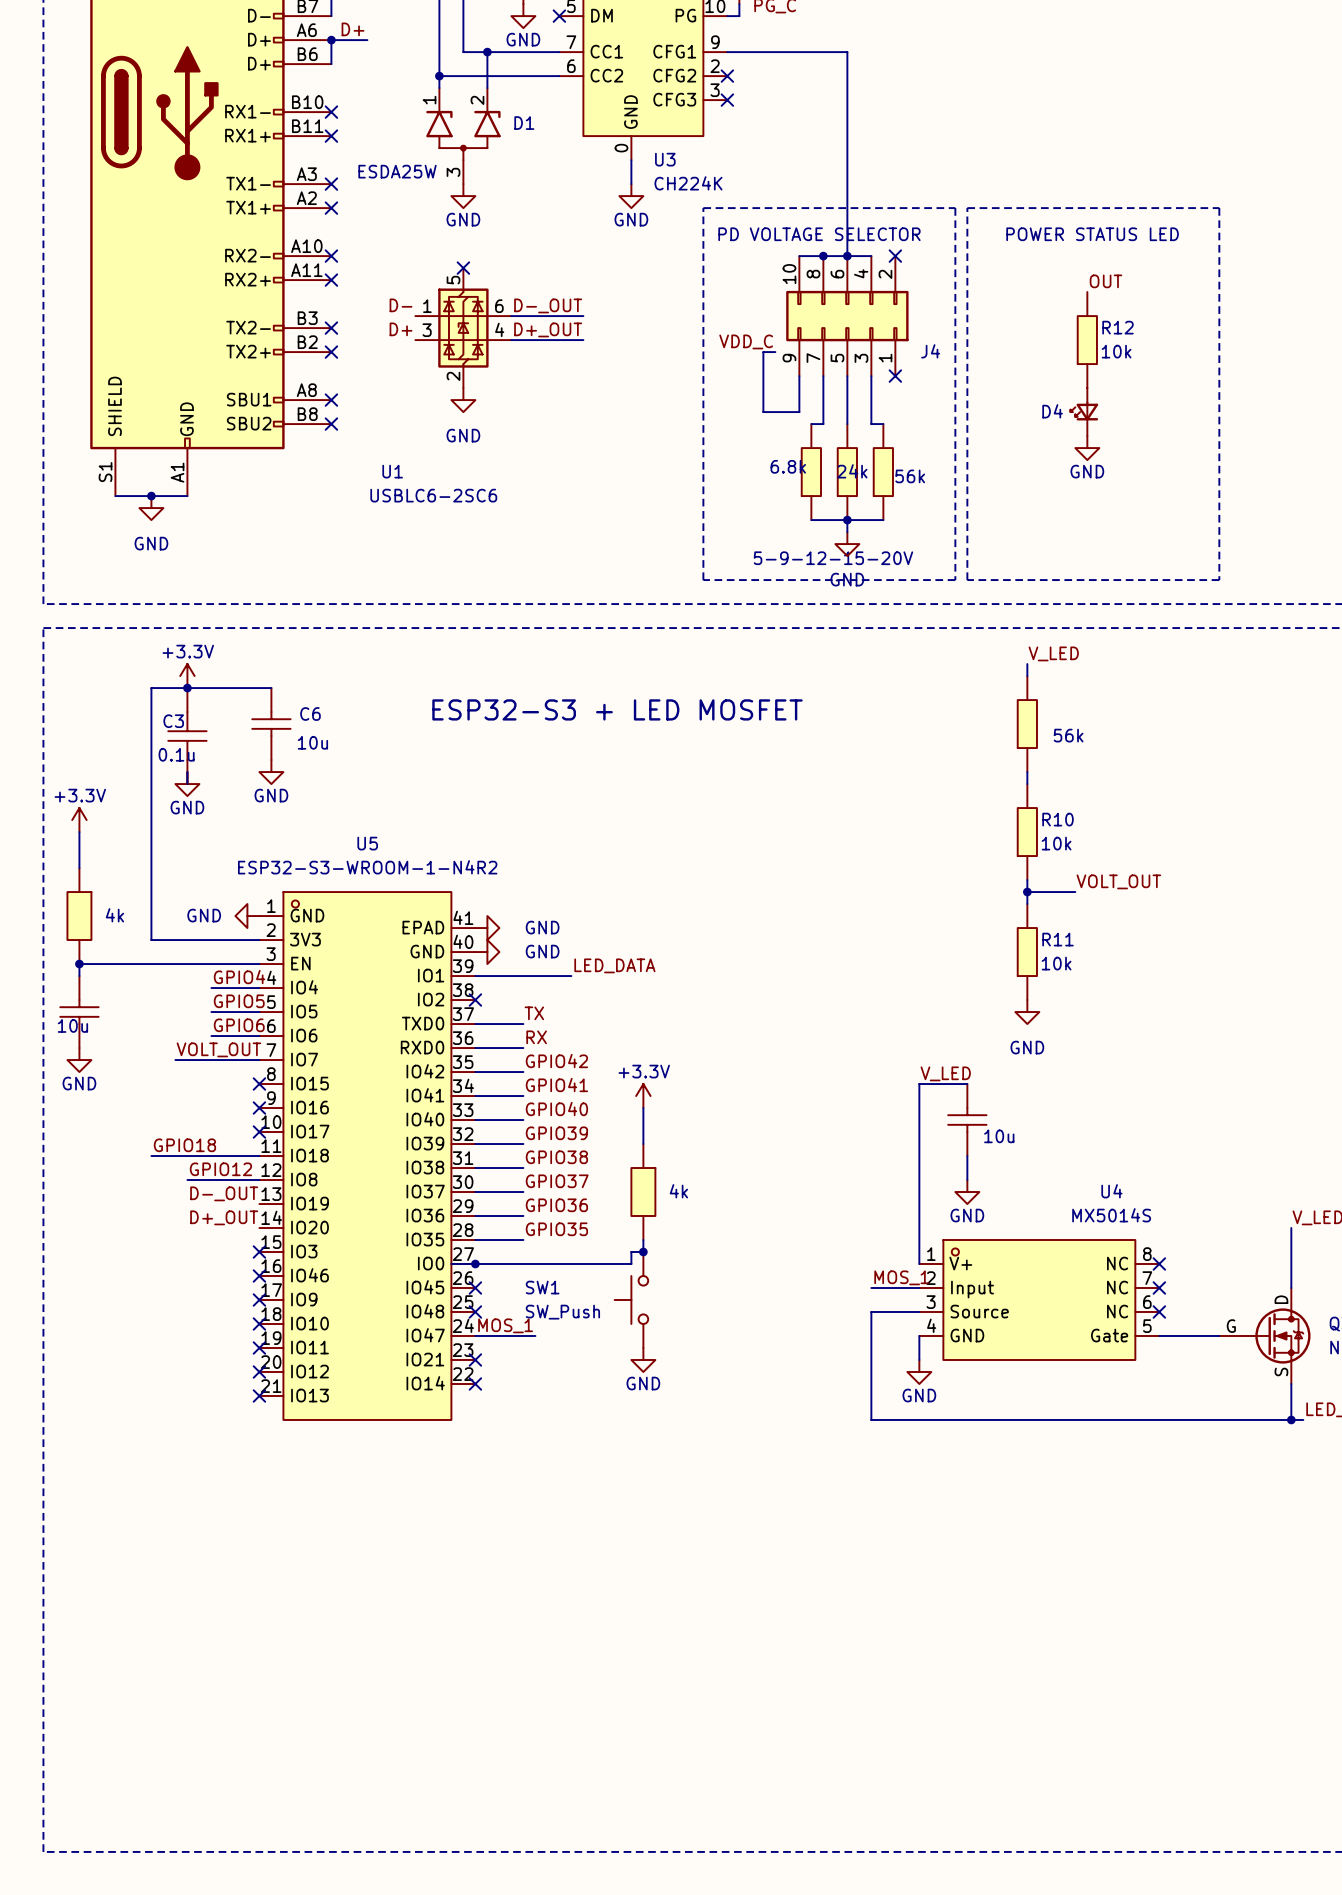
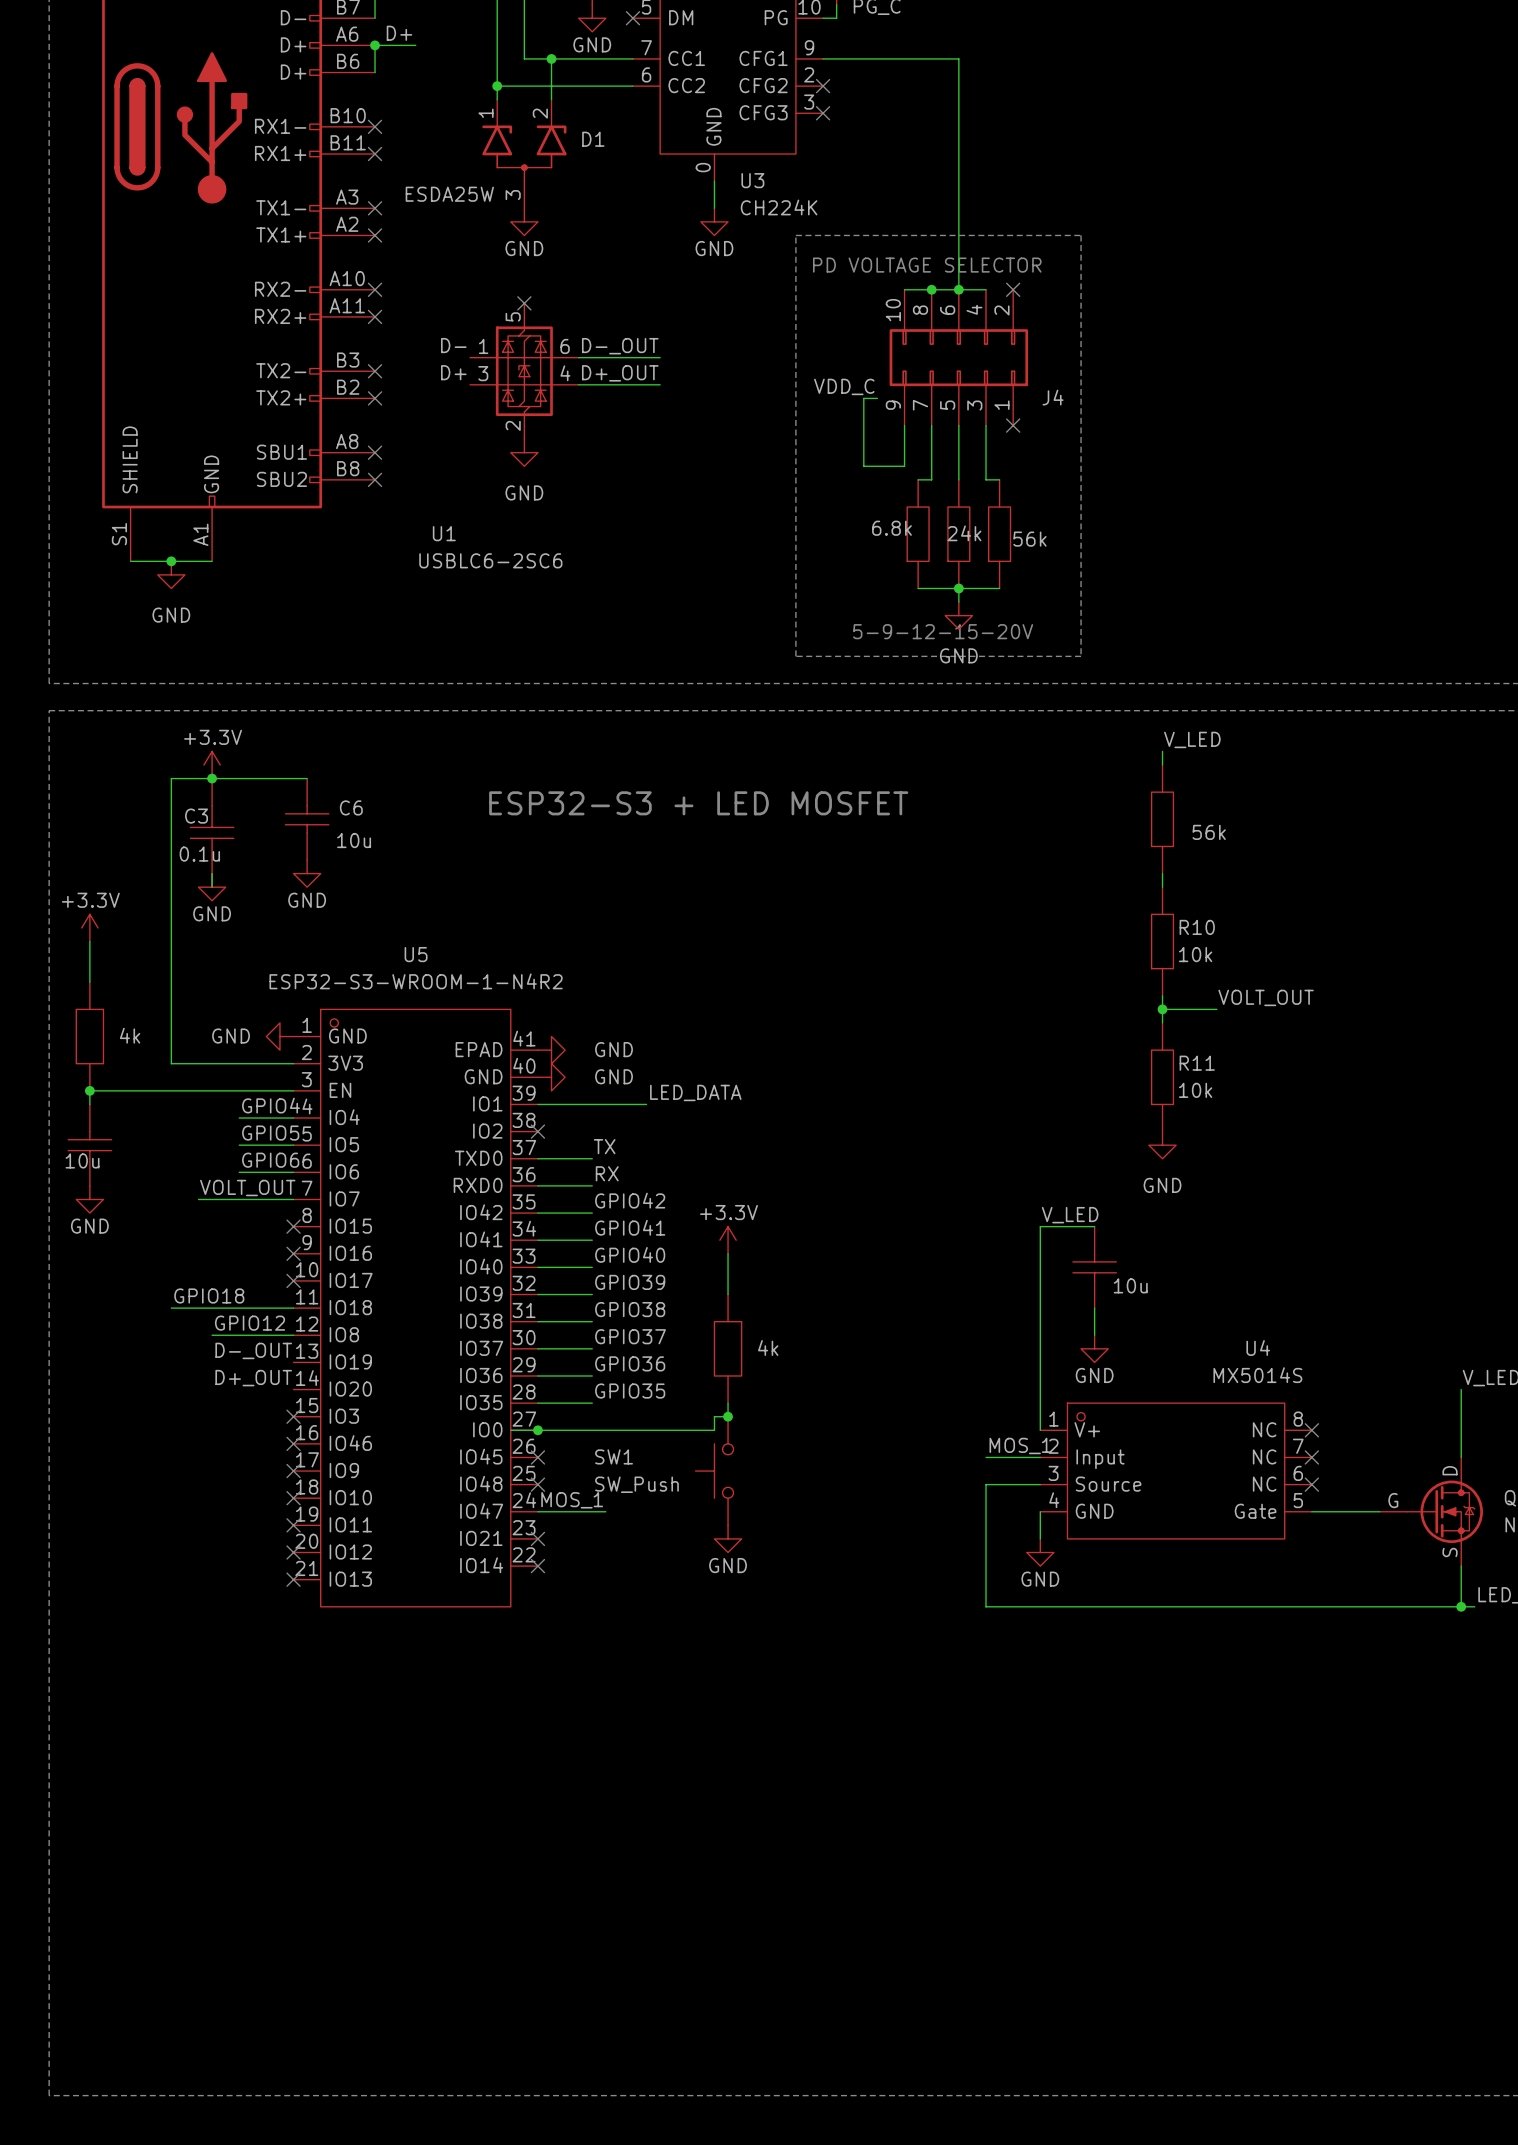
line: (967, 208) (1219, 208) (1219, 580) (967, 580) (967, 208) -> none
text: POWER STATUS LED (1092, 234) -> none
label: OUT (1106, 281) -> none
R12: 10k (1087, 340) -> none
D4: (1084, 412) -> none
power symbol: GND (1087, 448) -> none

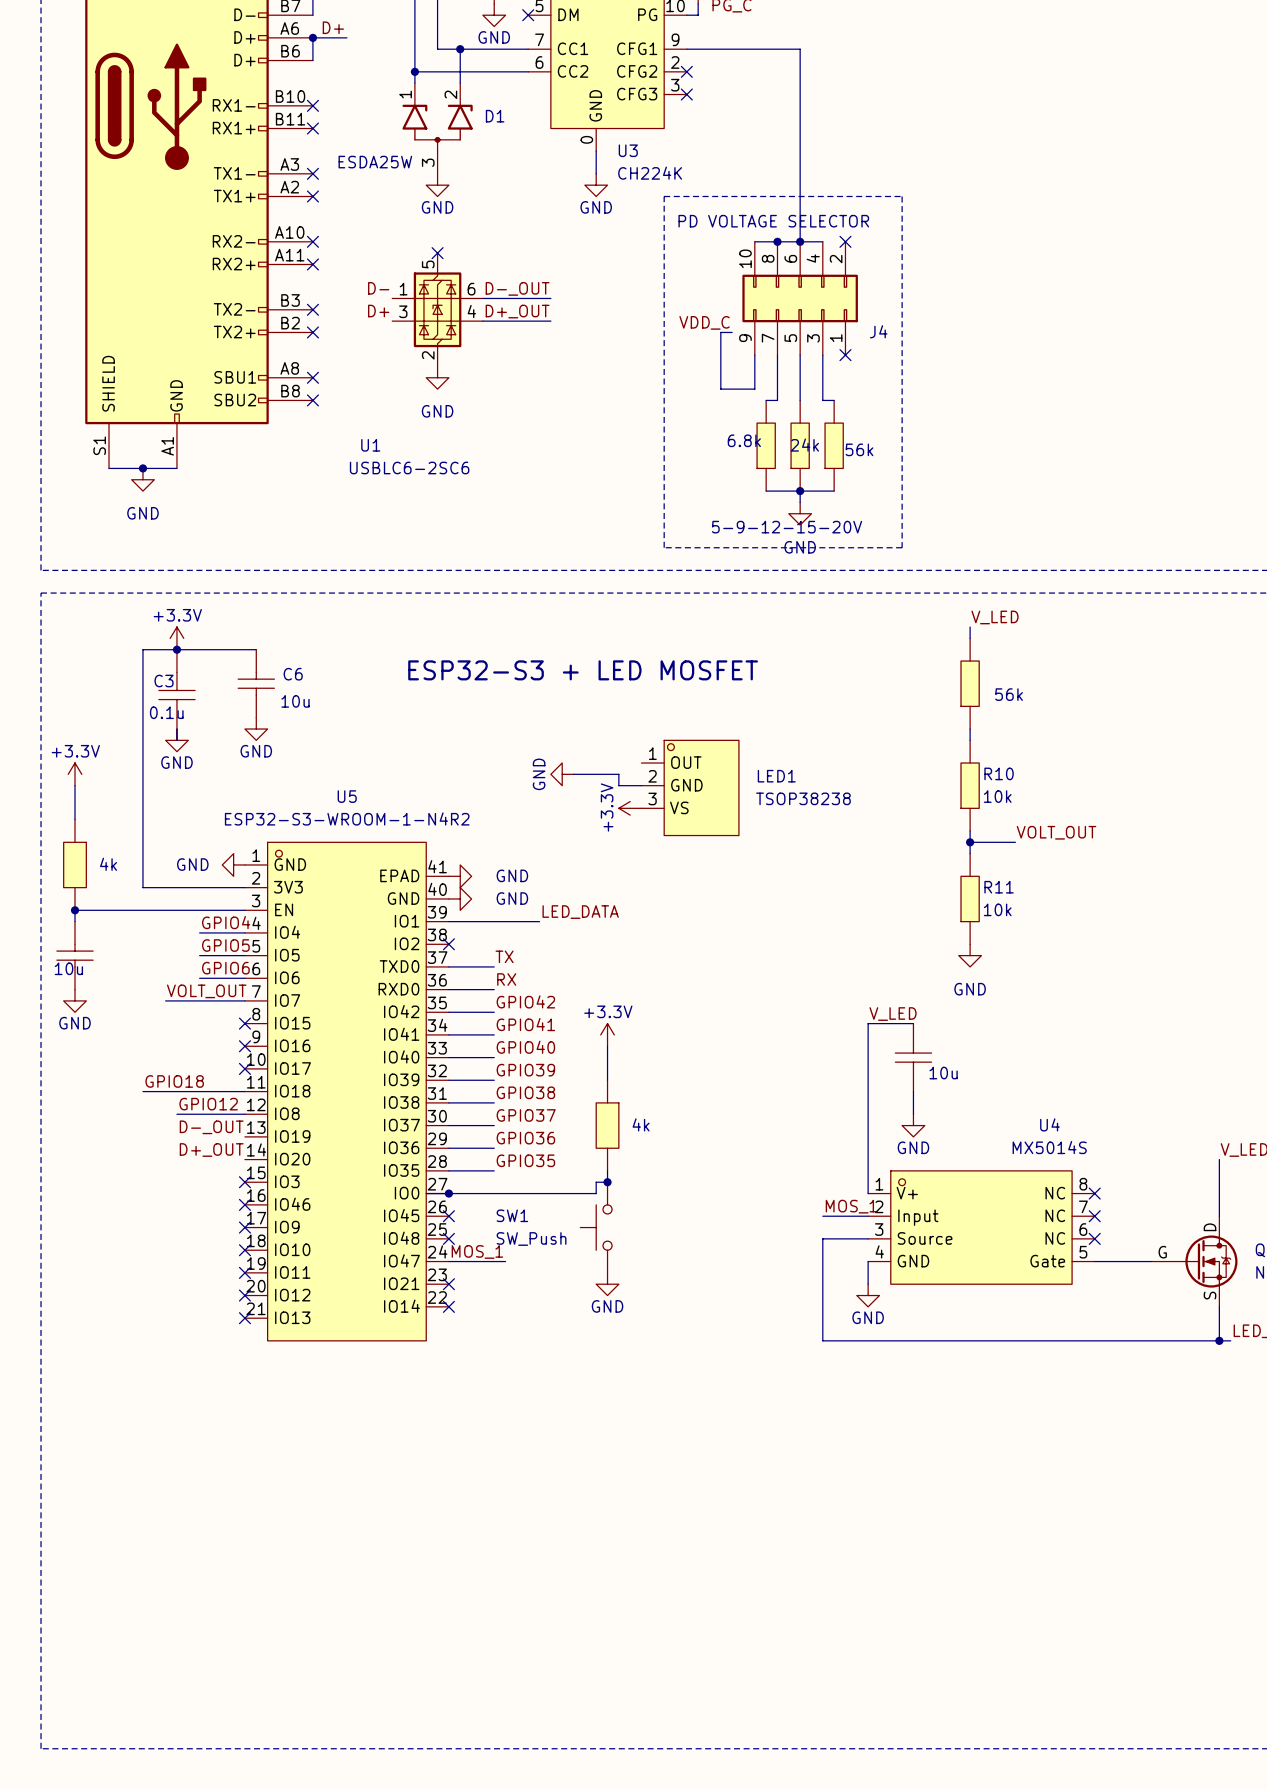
power symbol: none -> GND (562, 774)
wire: none -> (573, 774) (618, 774) (618, 785) (641, 785)
LED1: none -> TSOP38238 (690, 787)
power symbol: none -> +3.3V (630, 808)

